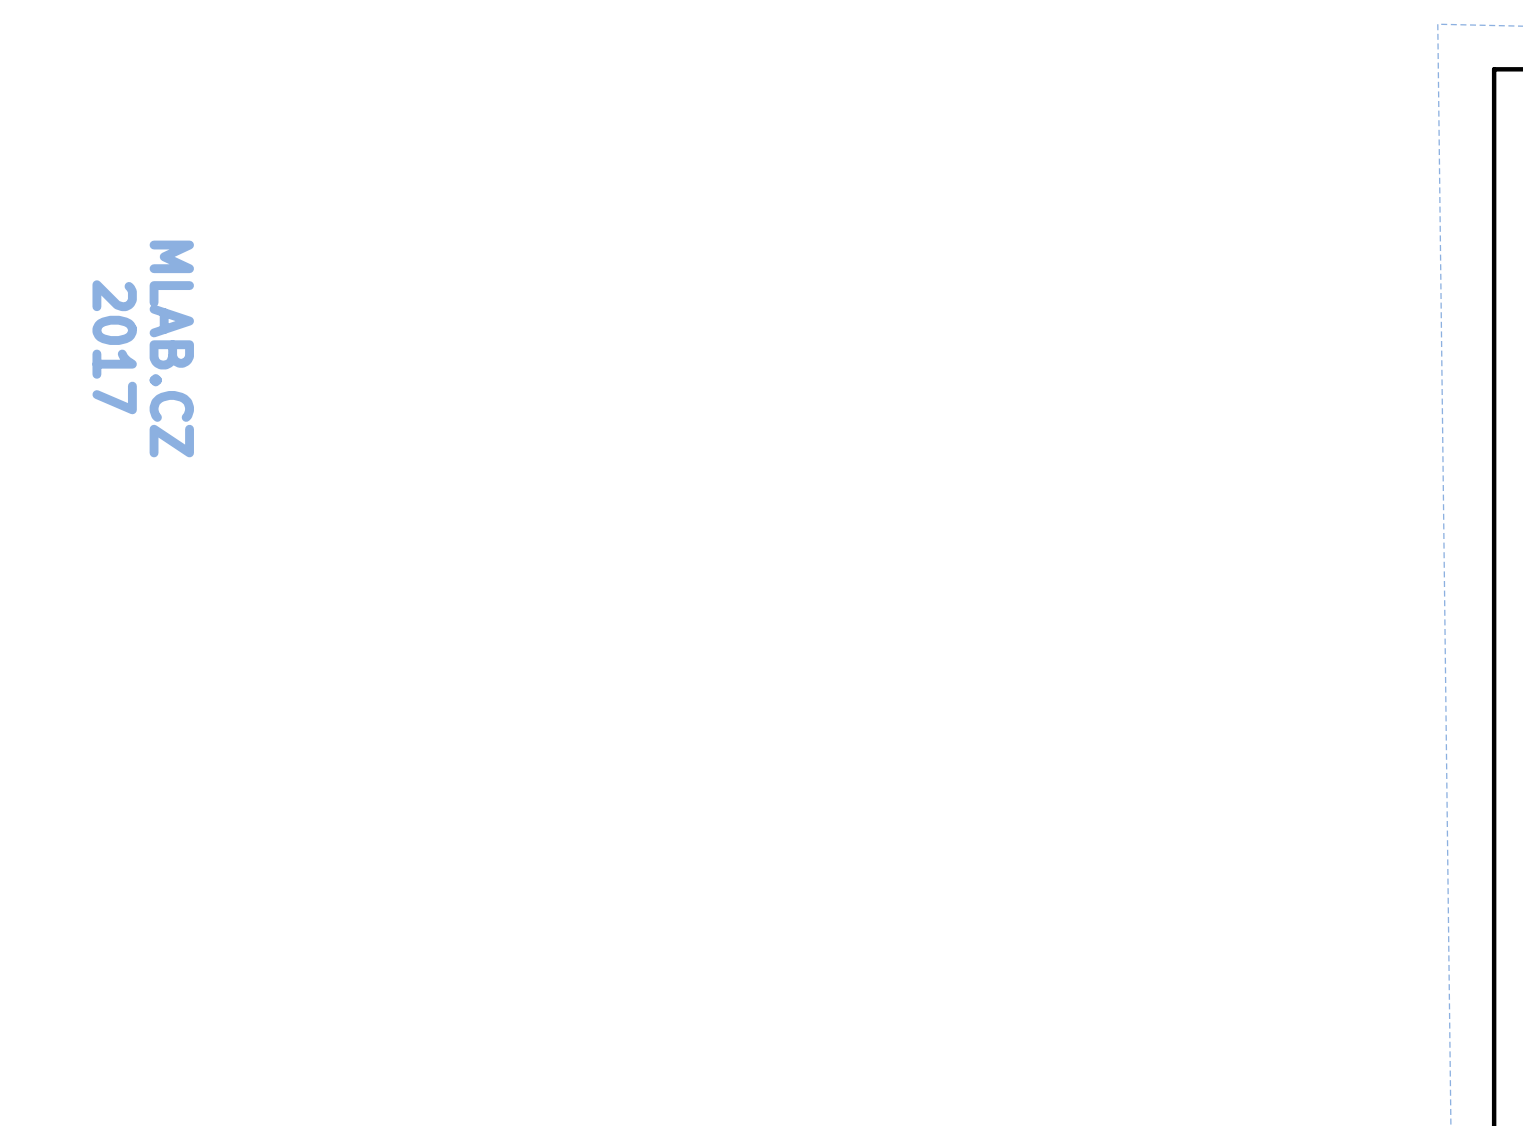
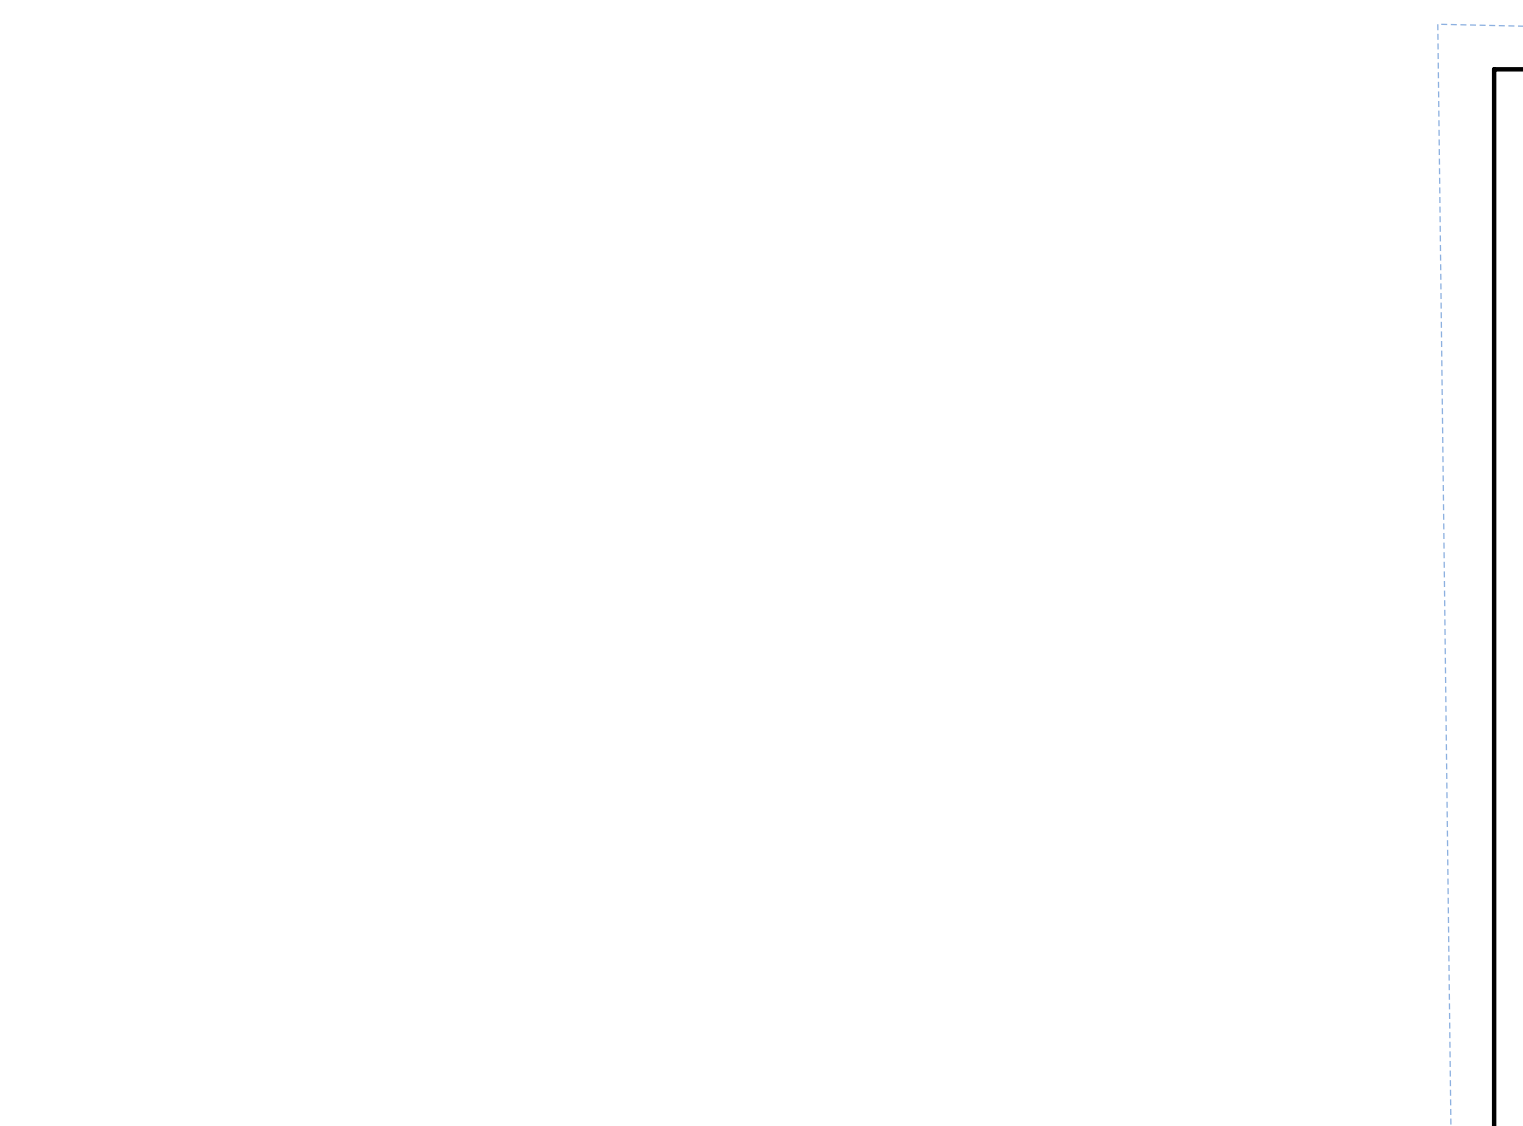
text: 2017 (114, 347) -> none
text: MLAB.CZ (171, 348) -> none

